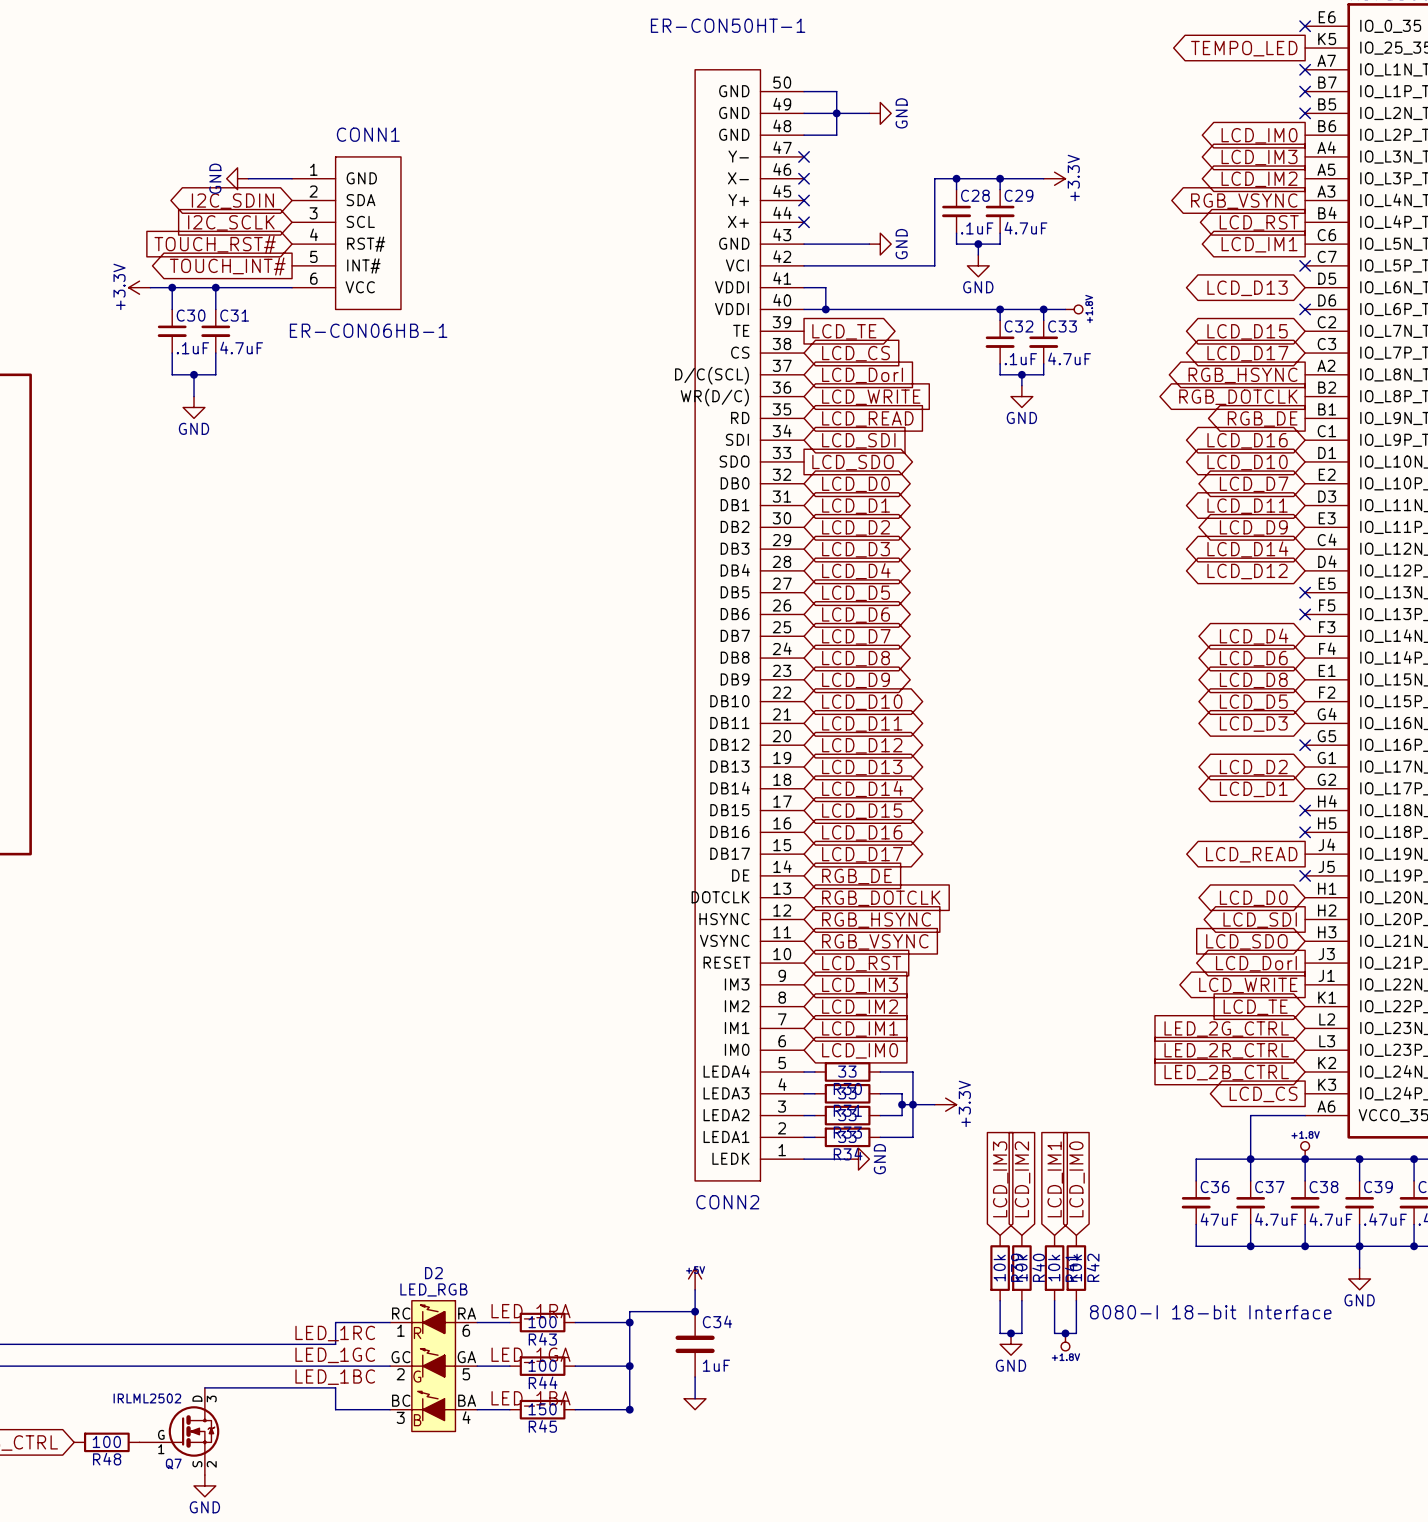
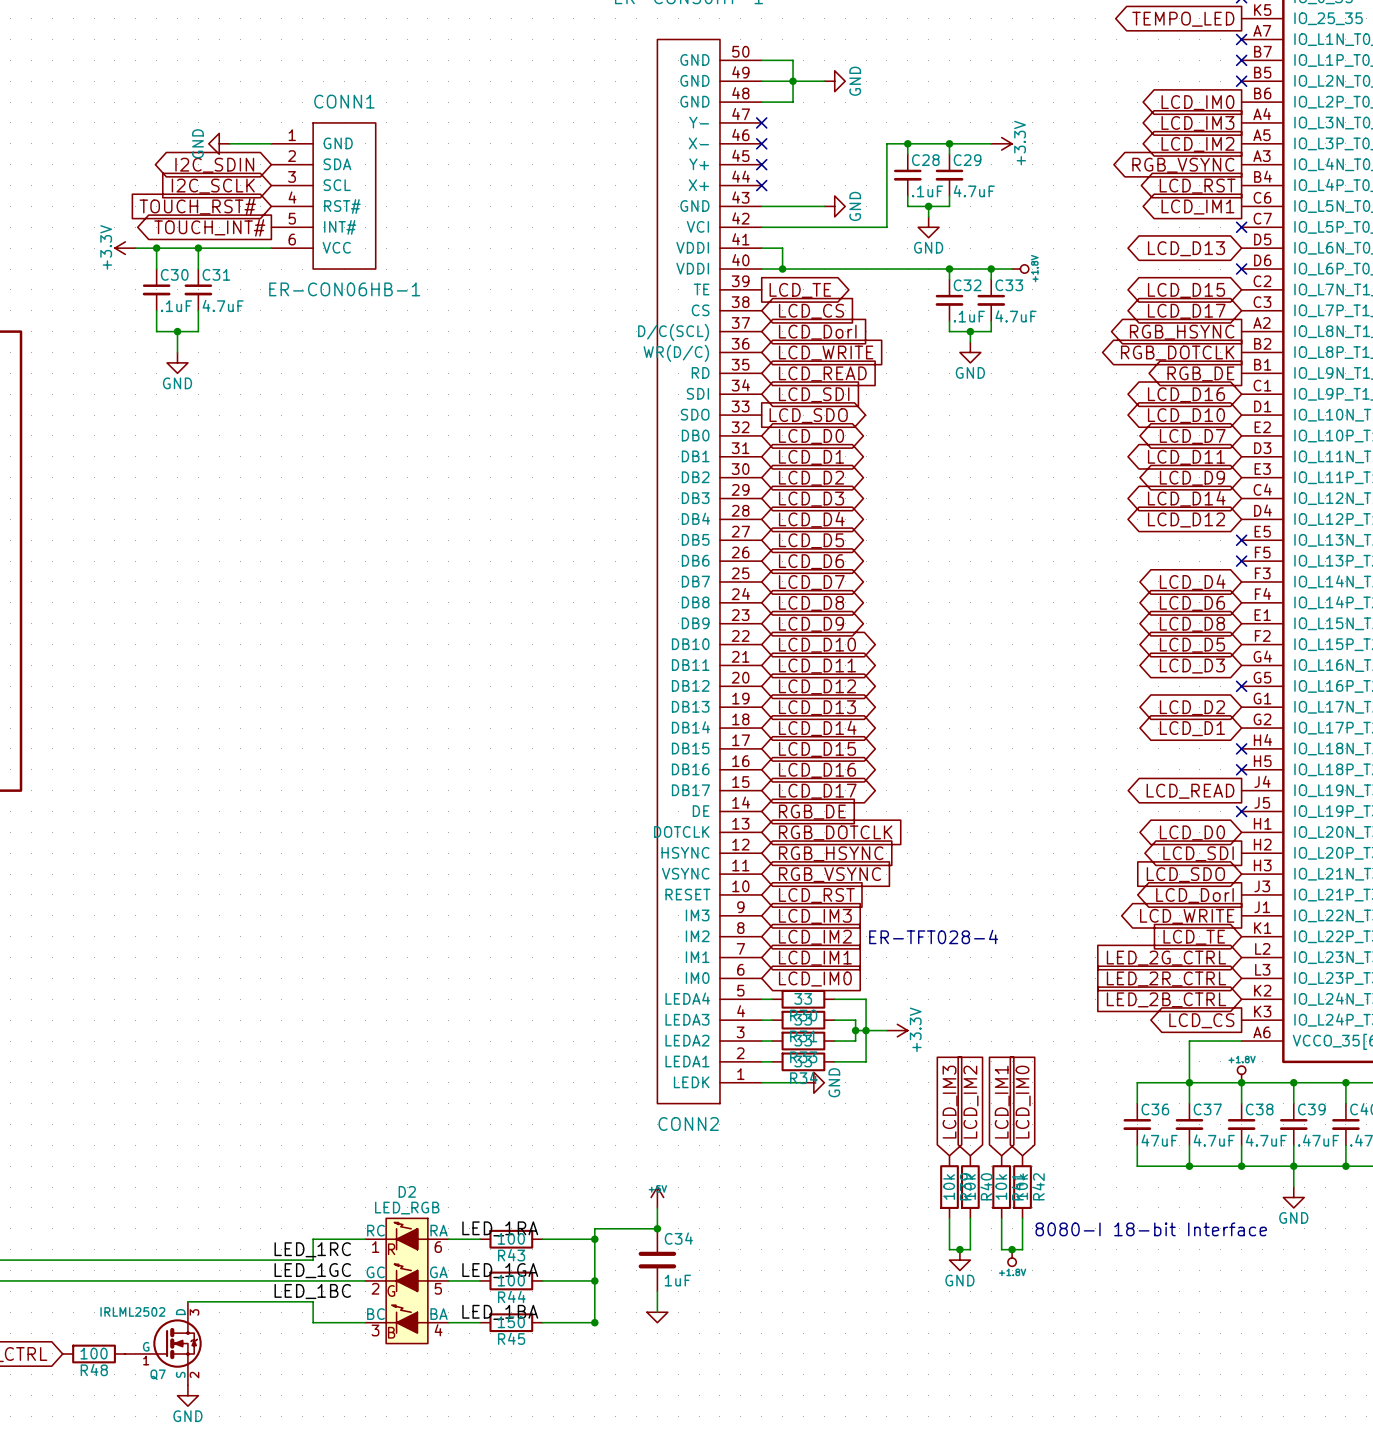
text: none -> ER-TFT028-4 (933, 936)

